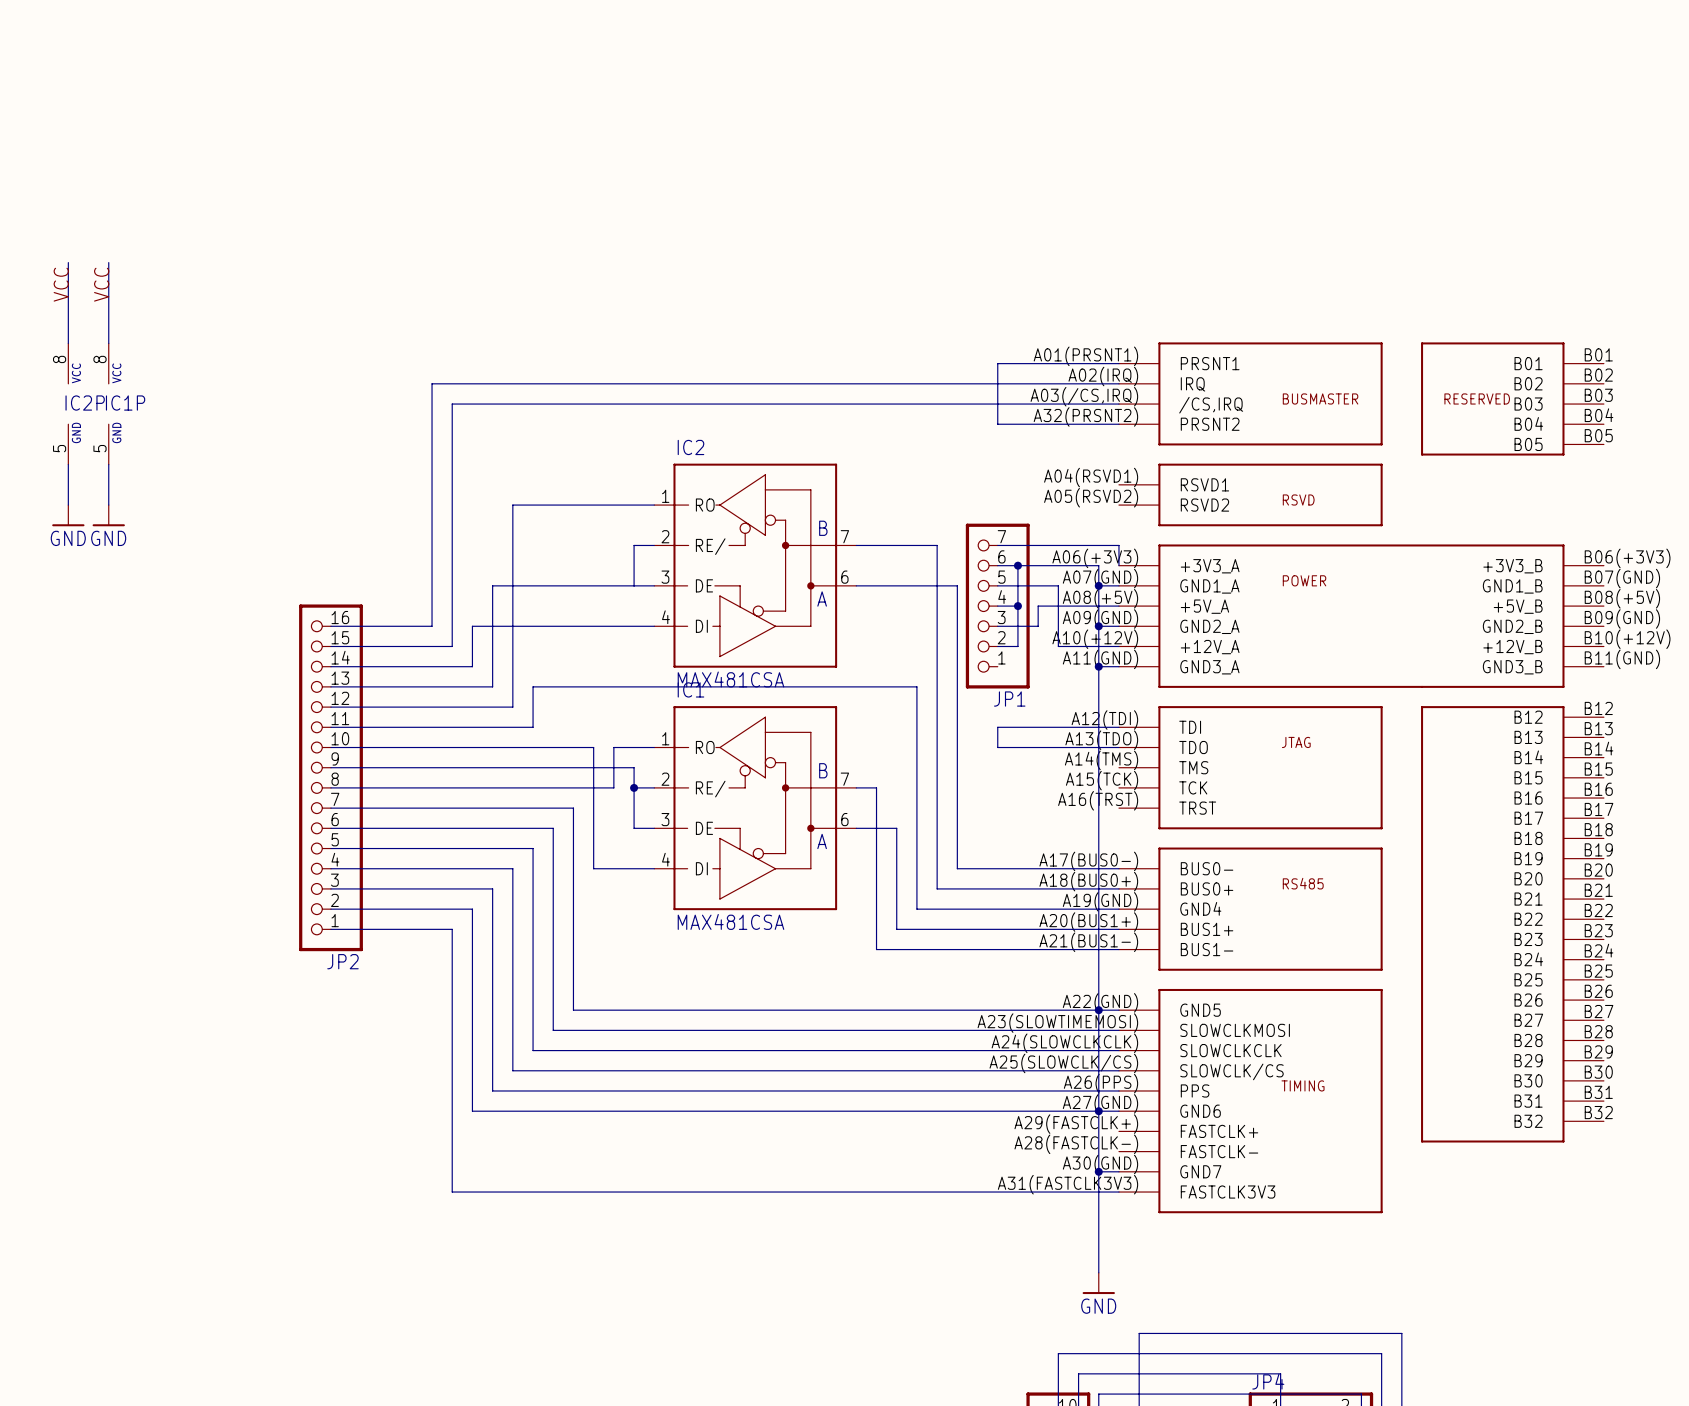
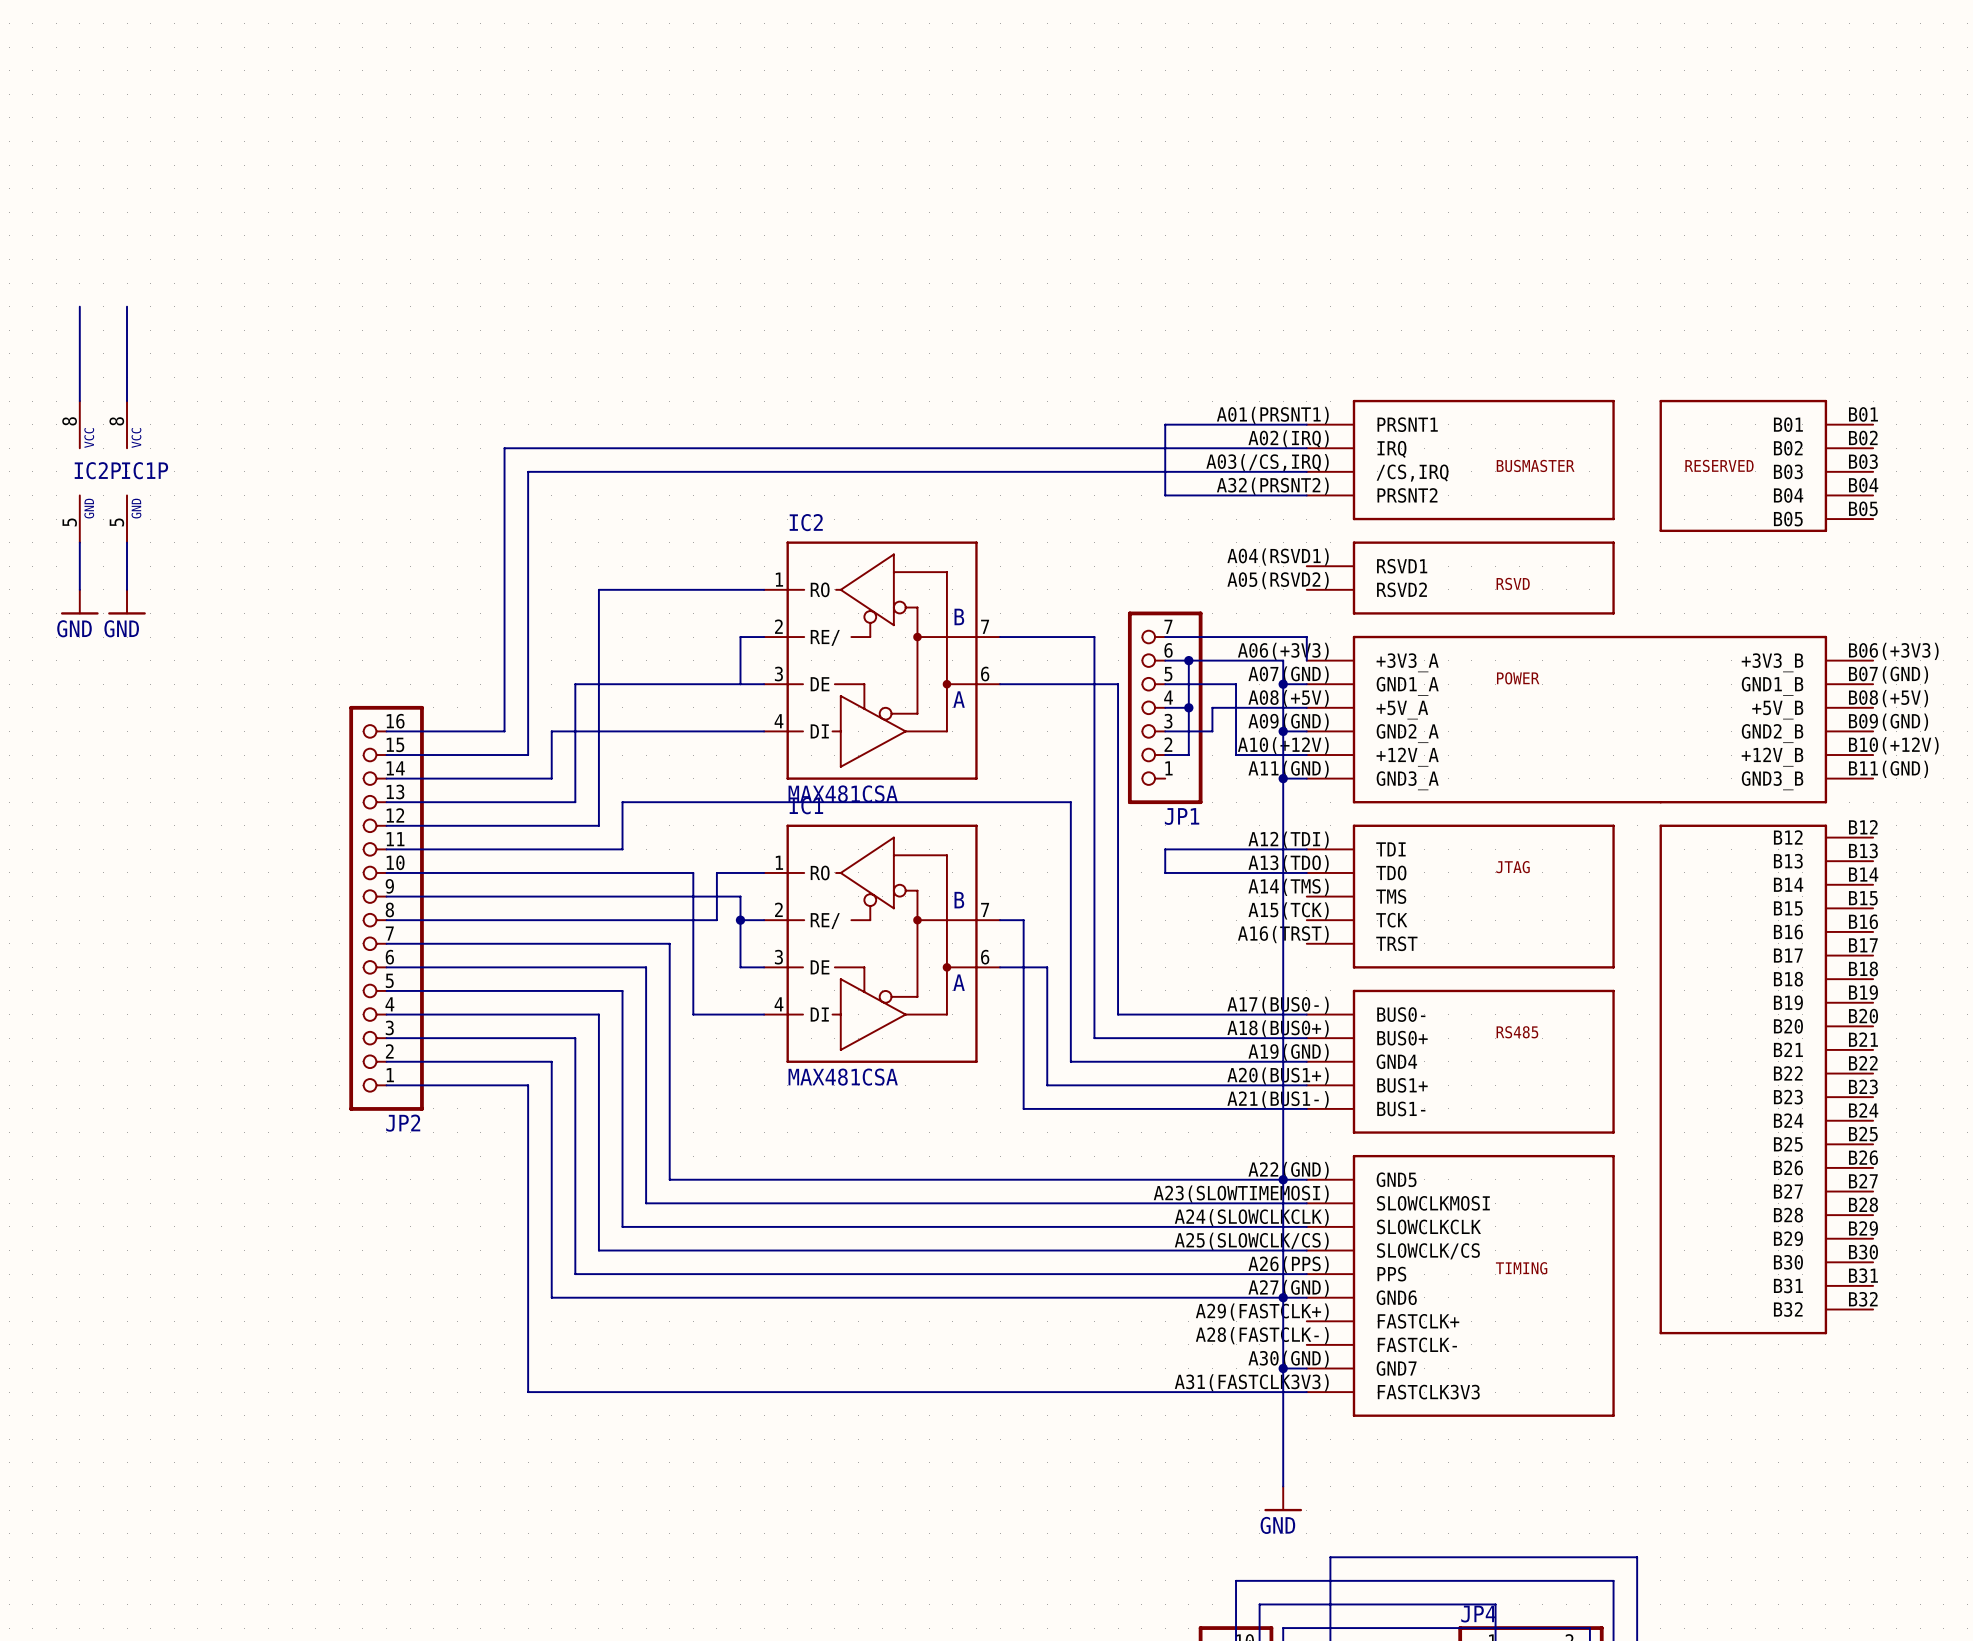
label: VCC (61, 284) -> none
label: VCC (101, 284) -> none

